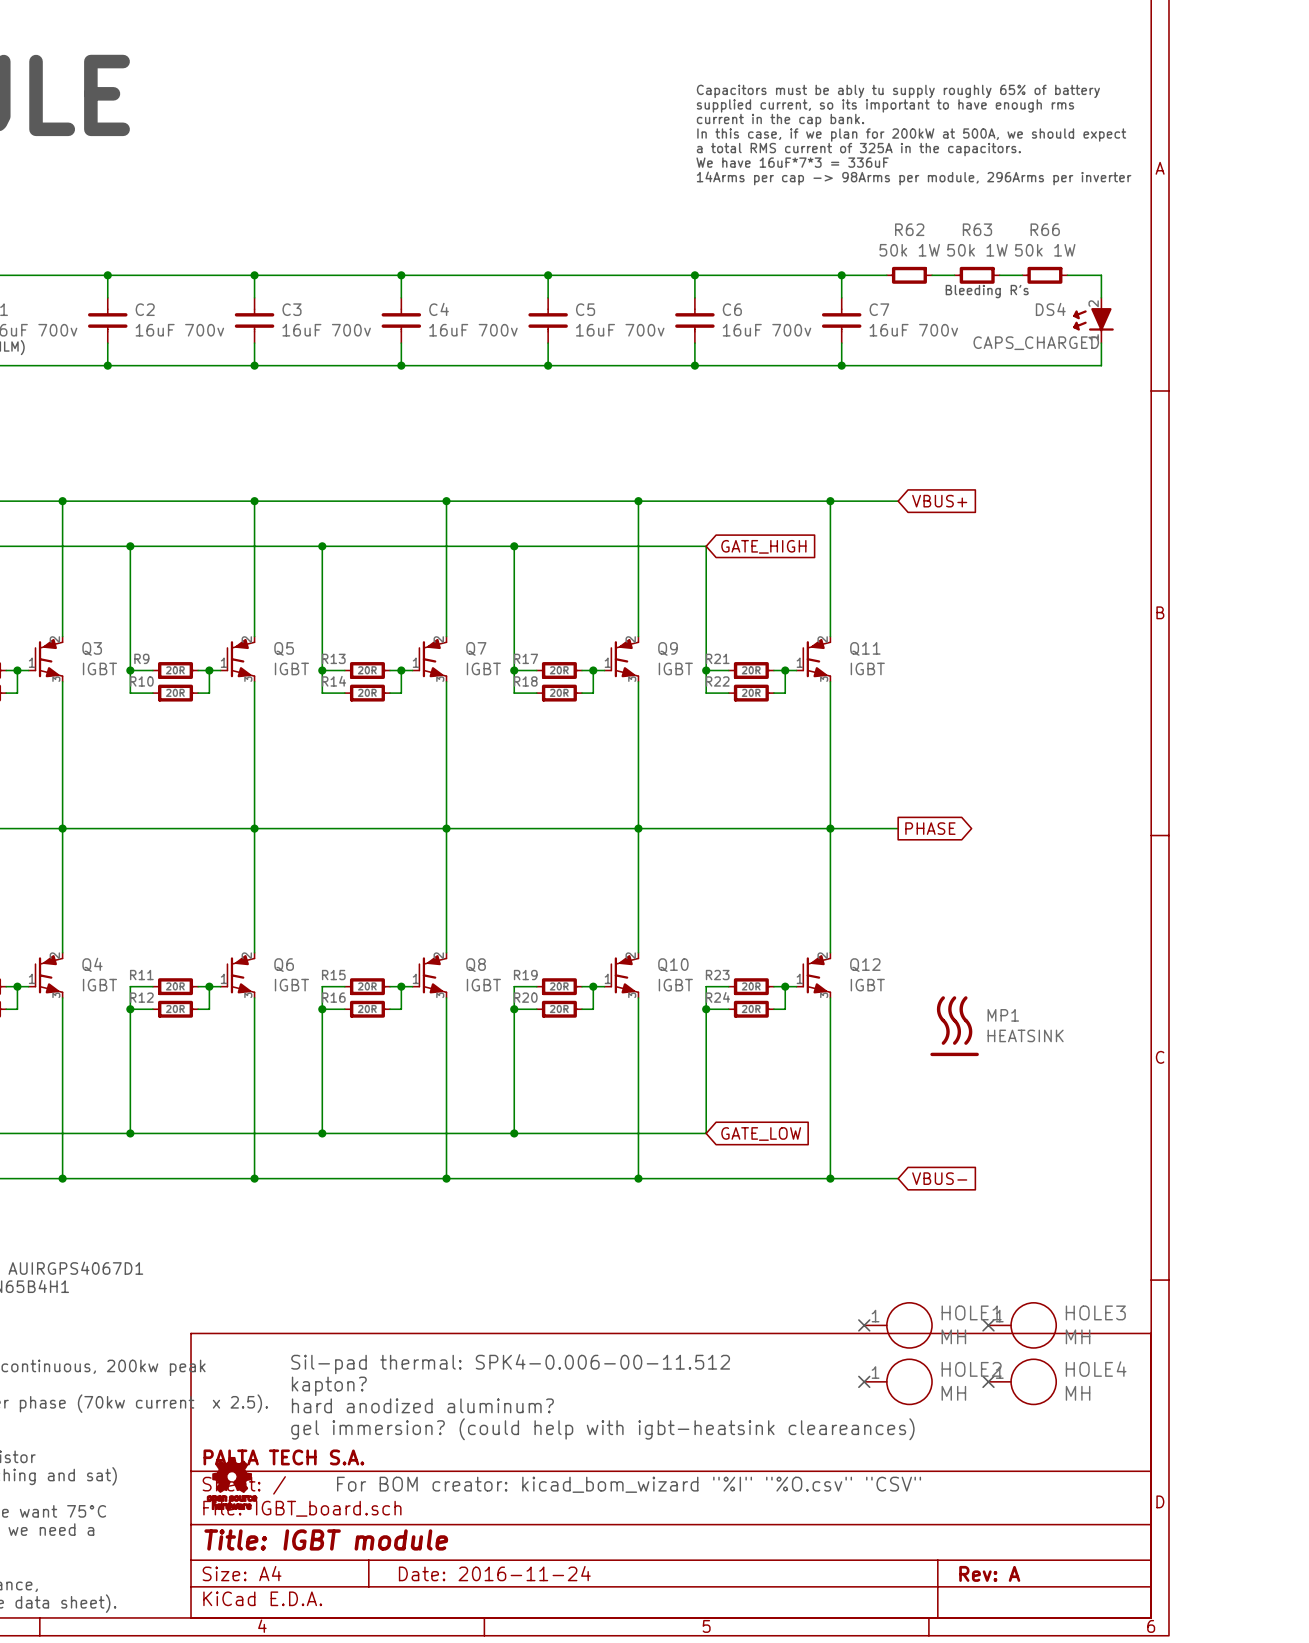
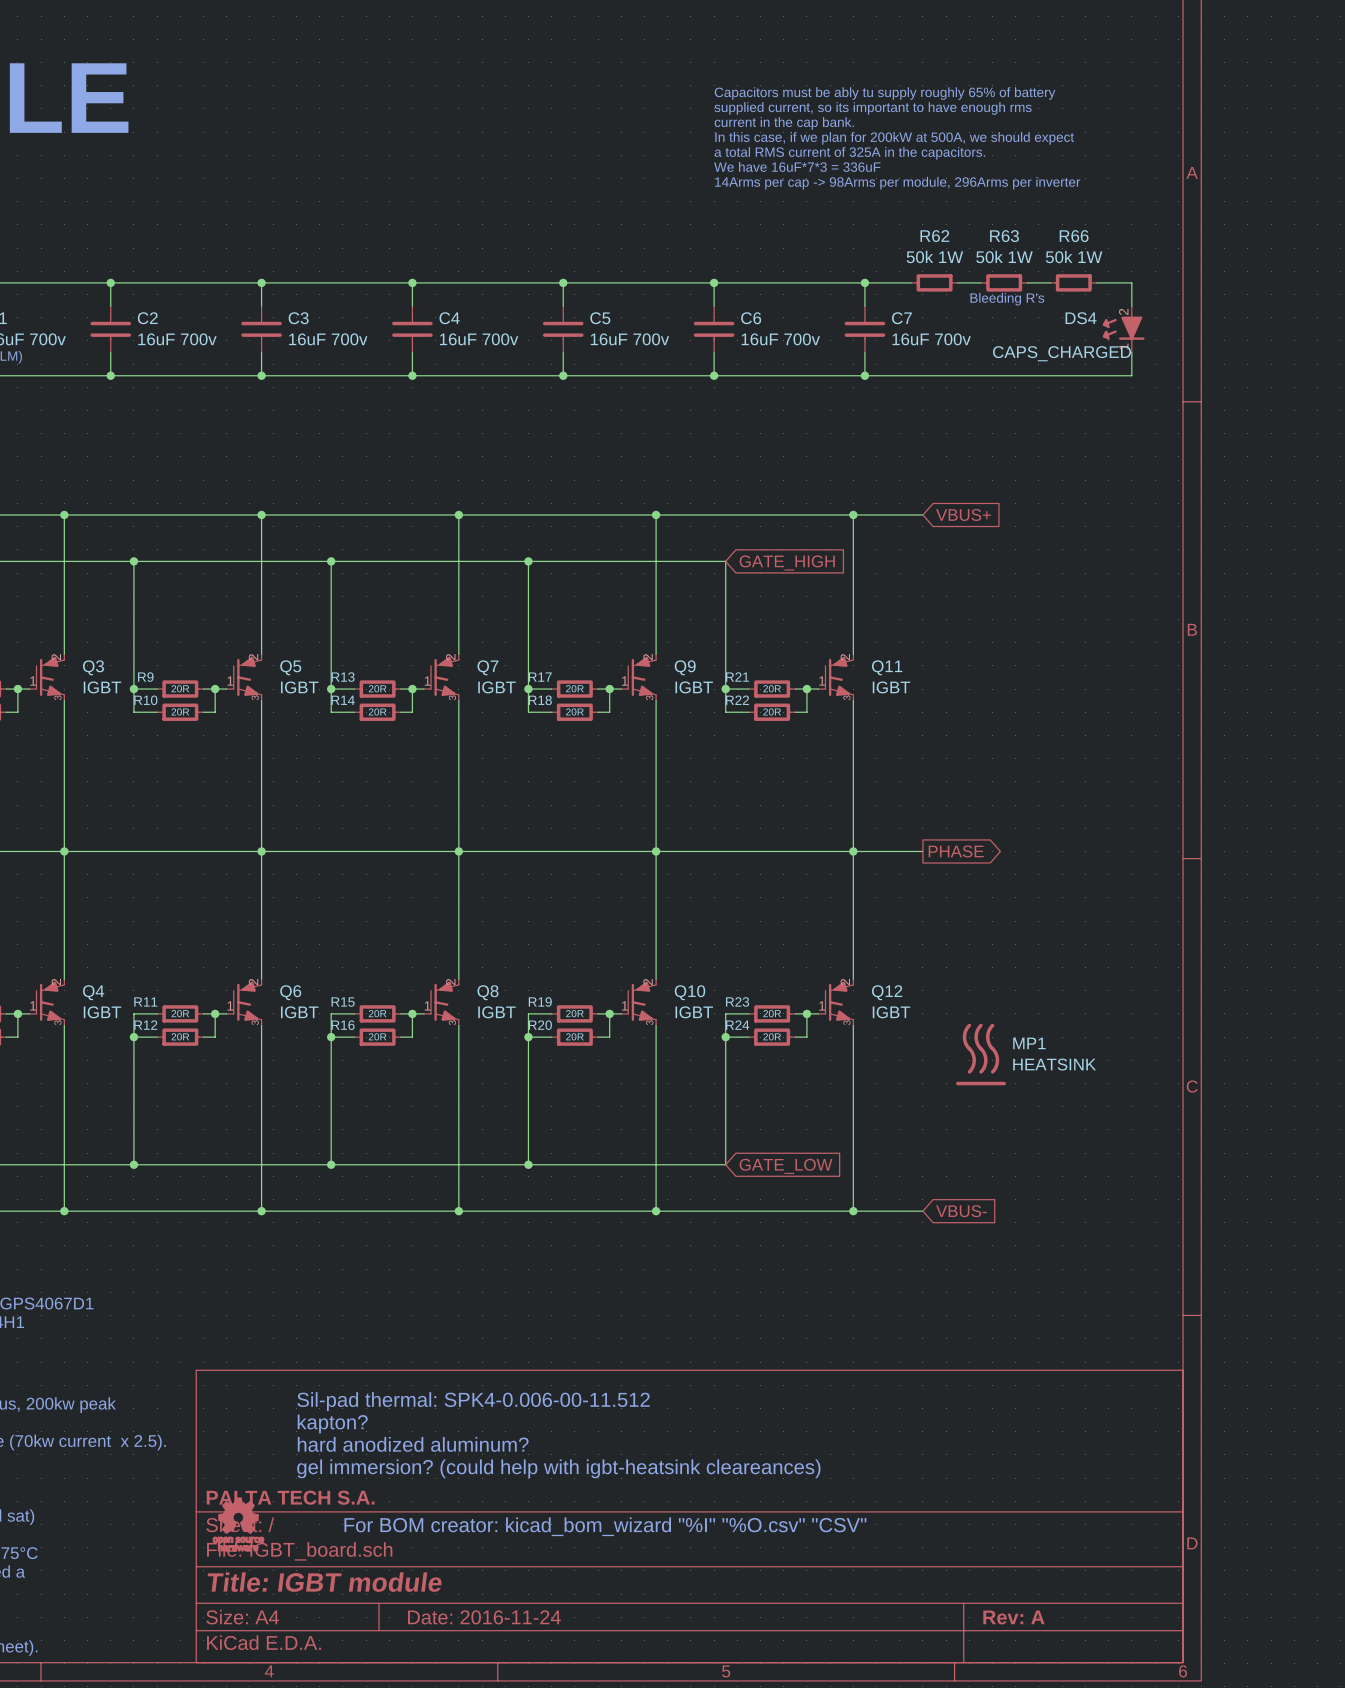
no-connect mark: (864, 1325) -> none
HOLE1: MH (898, 1325) -> none
no-connect mark: (988, 1325) -> none
HOLE3: MH (1022, 1325) -> none
no-connect mark: (864, 1381) -> none
HOLE2: MH (898, 1381) -> none
no-connect mark: (988, 1381) -> none
HOLE4: MH (1022, 1381) -> none

